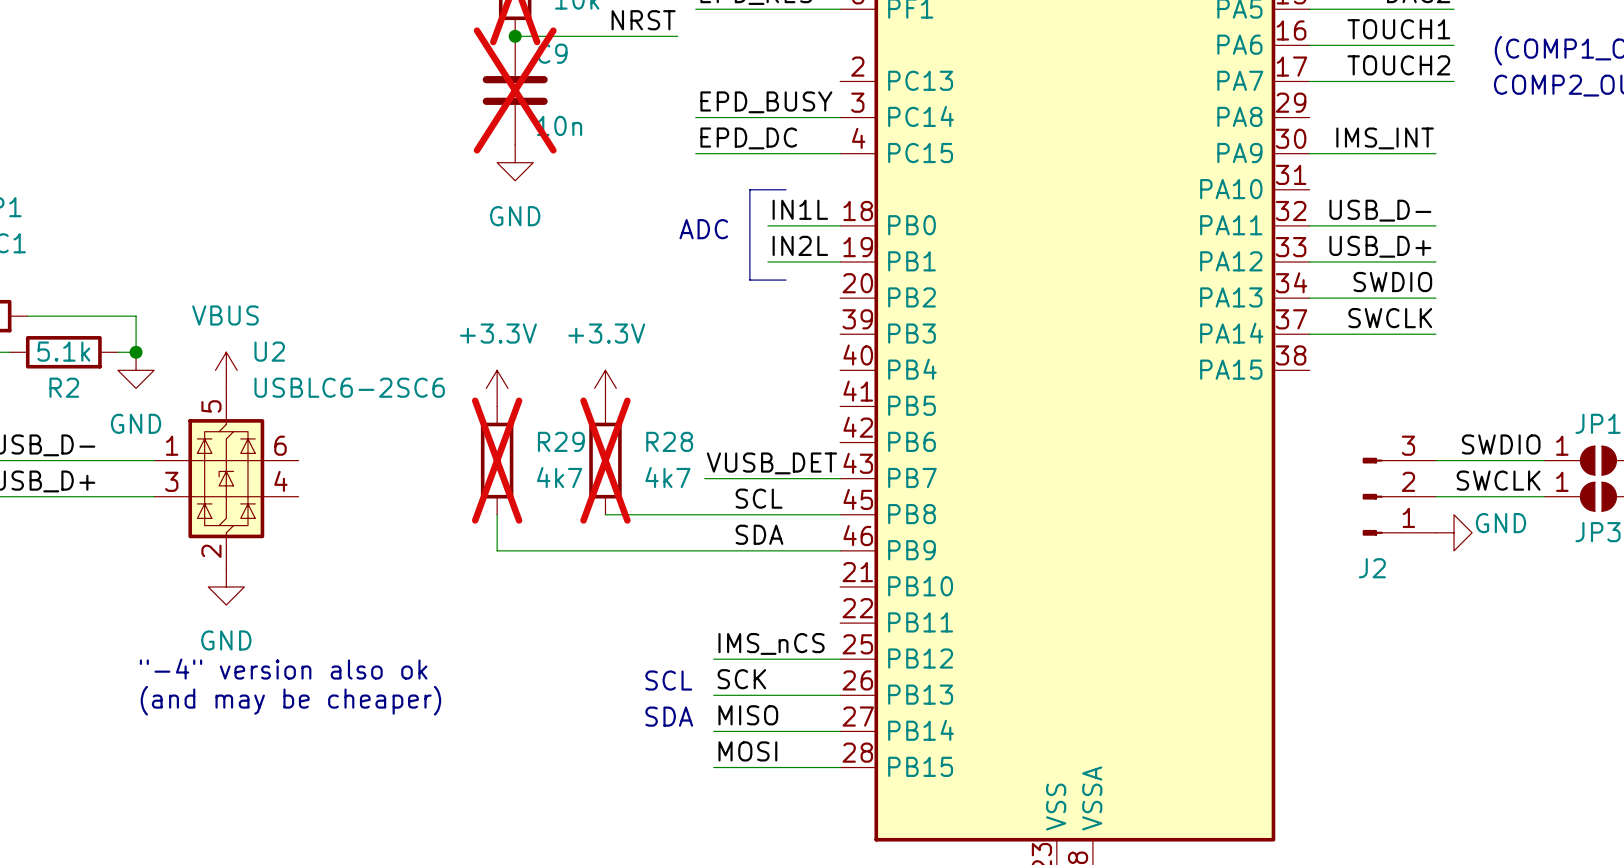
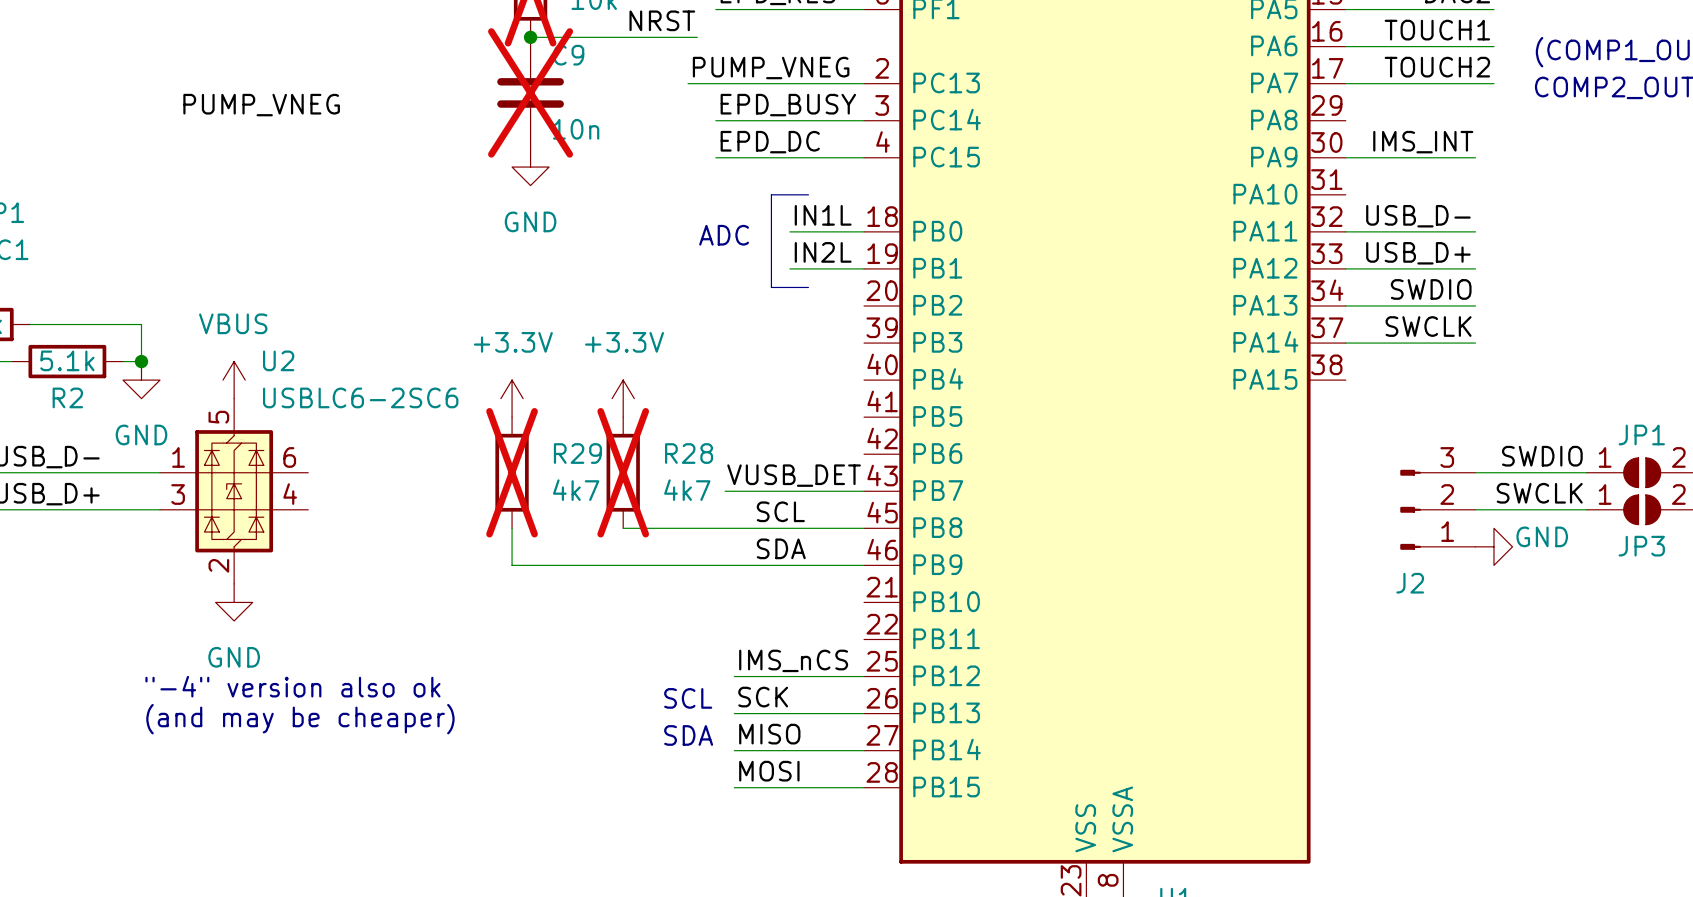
label: none -> PUMP_VNEG (771, 68)
wire: none -> (688, 83) (864, 83)
label: none -> PUMP_VNEG (261, 105)

